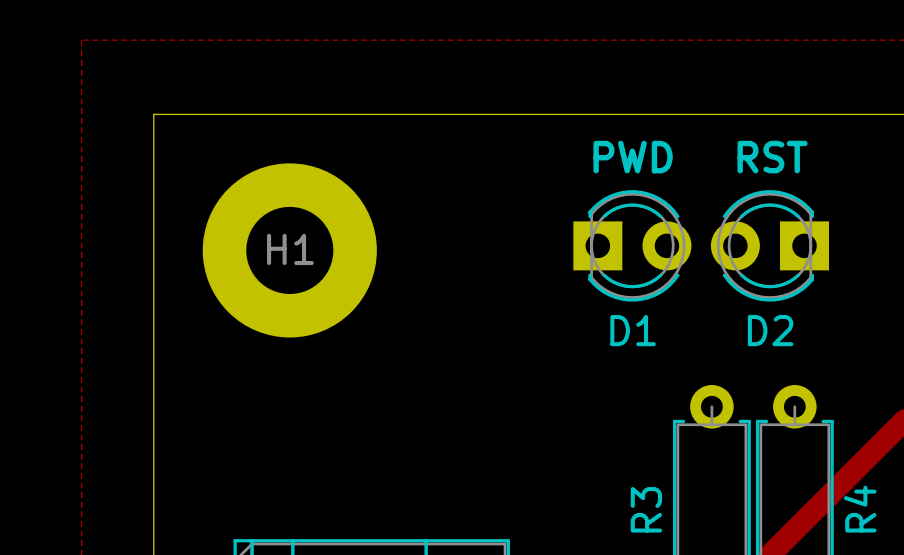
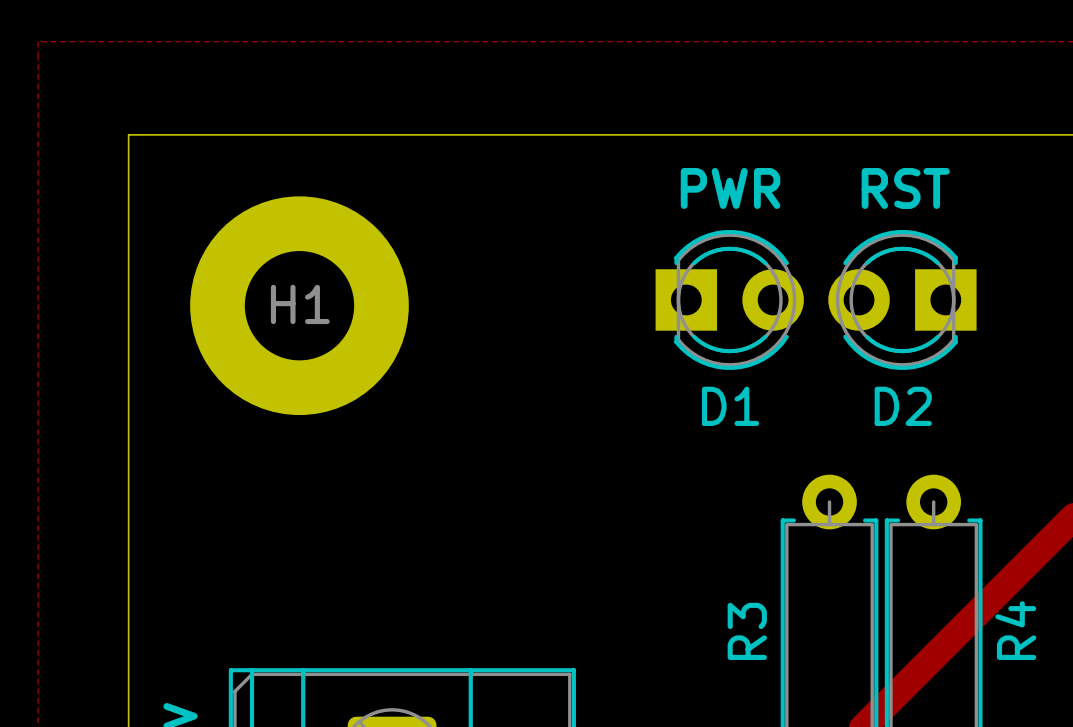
text: PWD (633, 157) -> PWR (730, 188)

